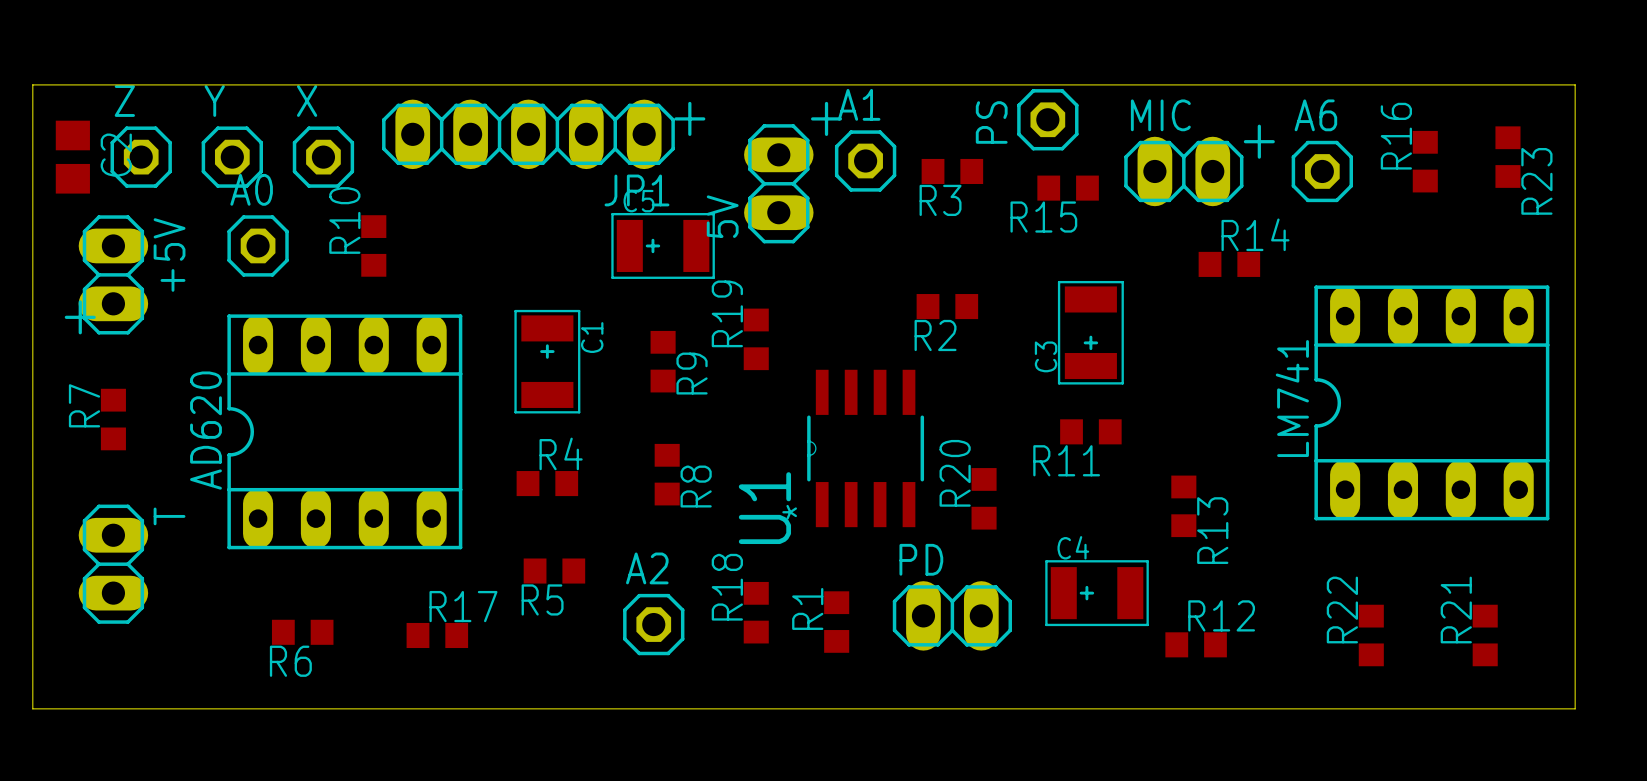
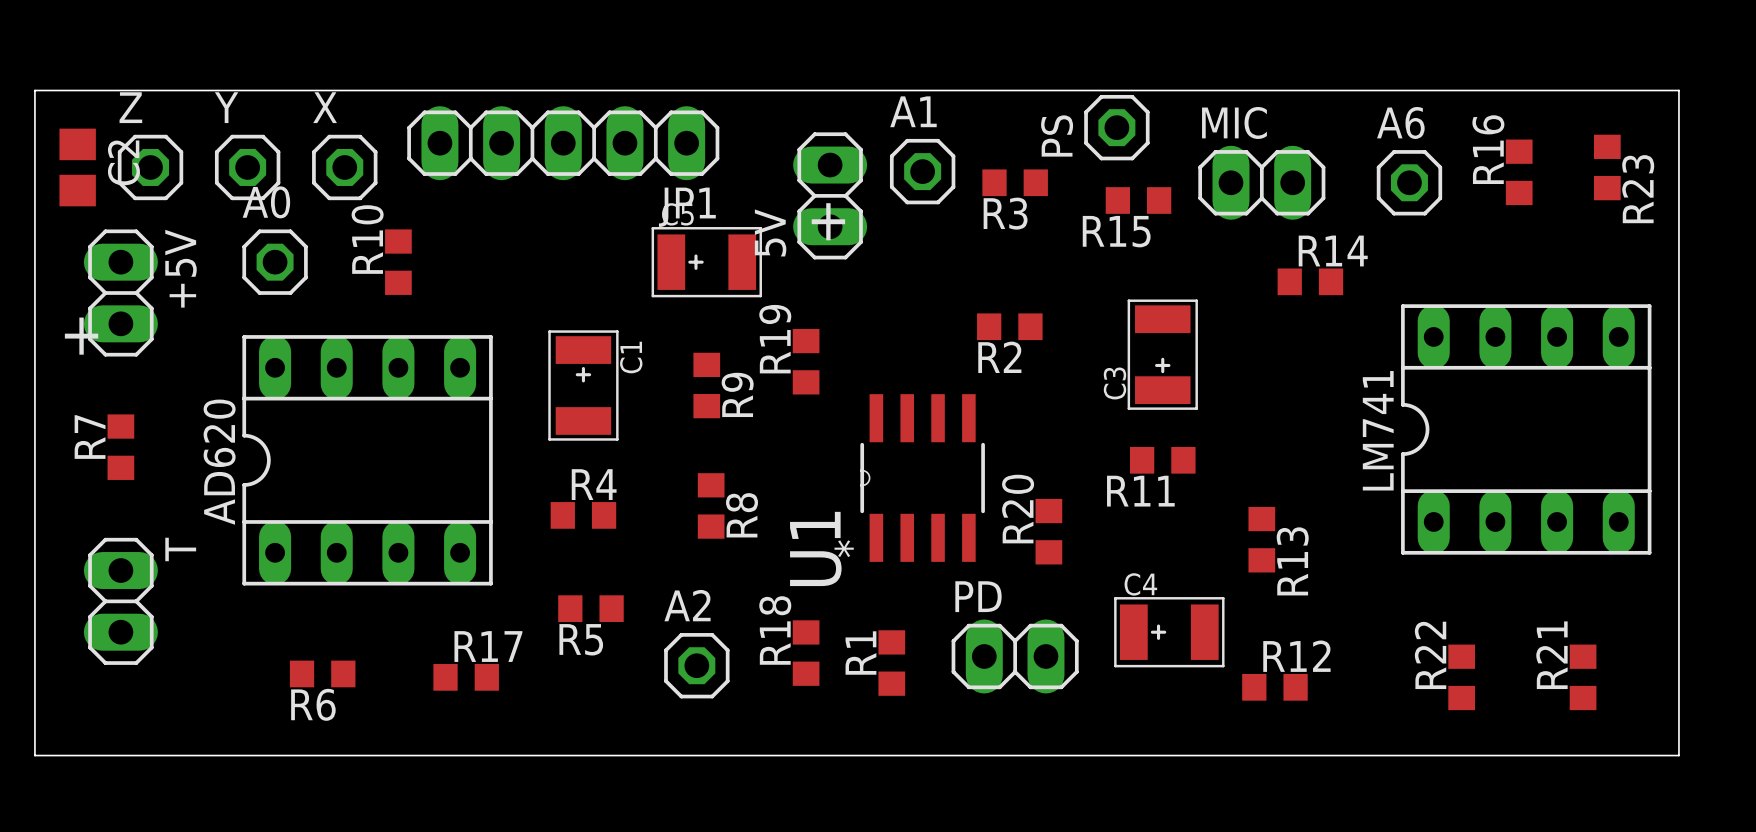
text: + (689, 118) -> none
text: + (826, 118) -> none
text: + (1259, 141) -> none
text: none -> + (828, 221)

